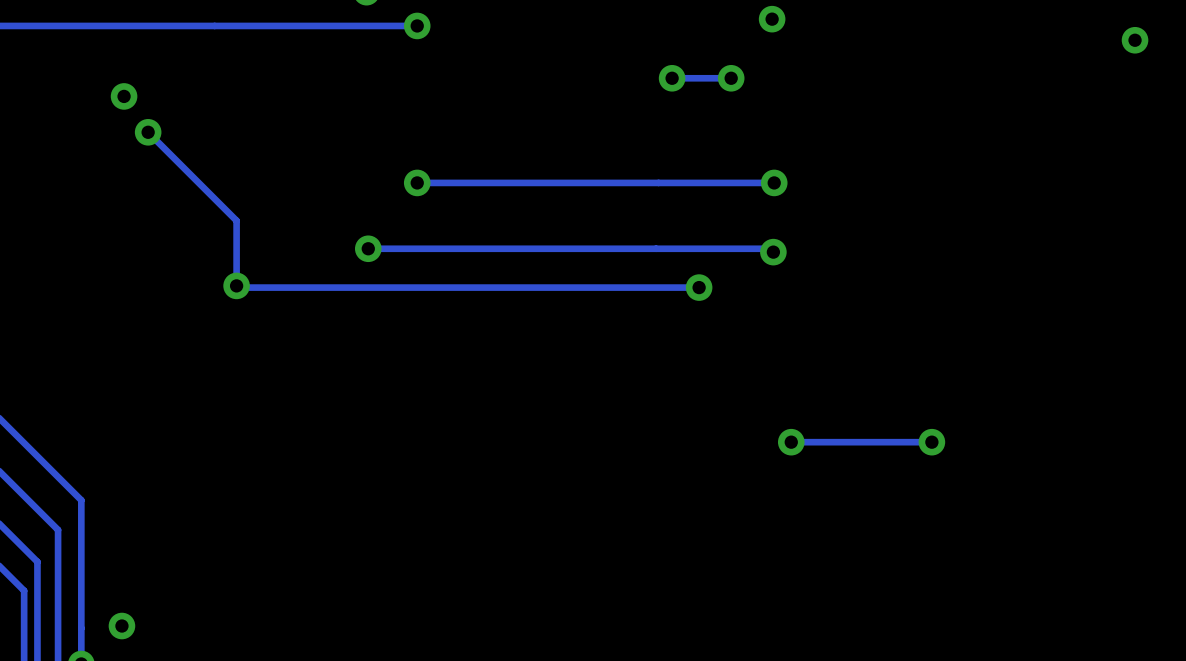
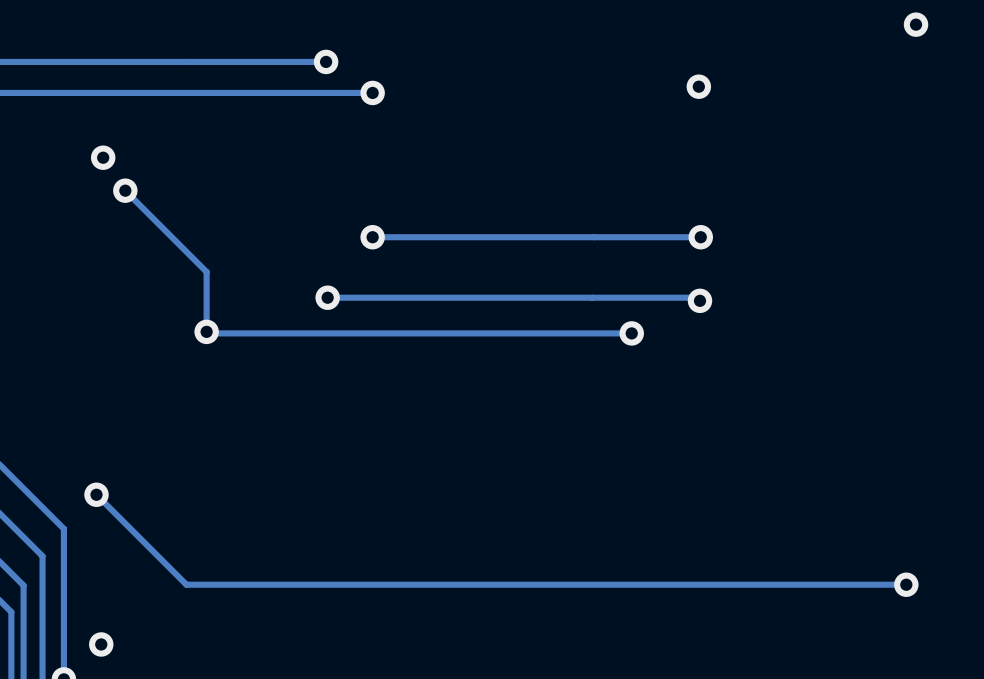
via: (672, 78) -> none
track: (731, 78) (672, 78) -> none
via: (731, 78) -> none
via: (791, 442) -> none
track: (931, 442) (791, 442) -> none
via: (931, 442) -> none
track: none -> (96, 494) (186, 584) (907, 584)
via: none -> (96, 494)
via: none -> (906, 584)

